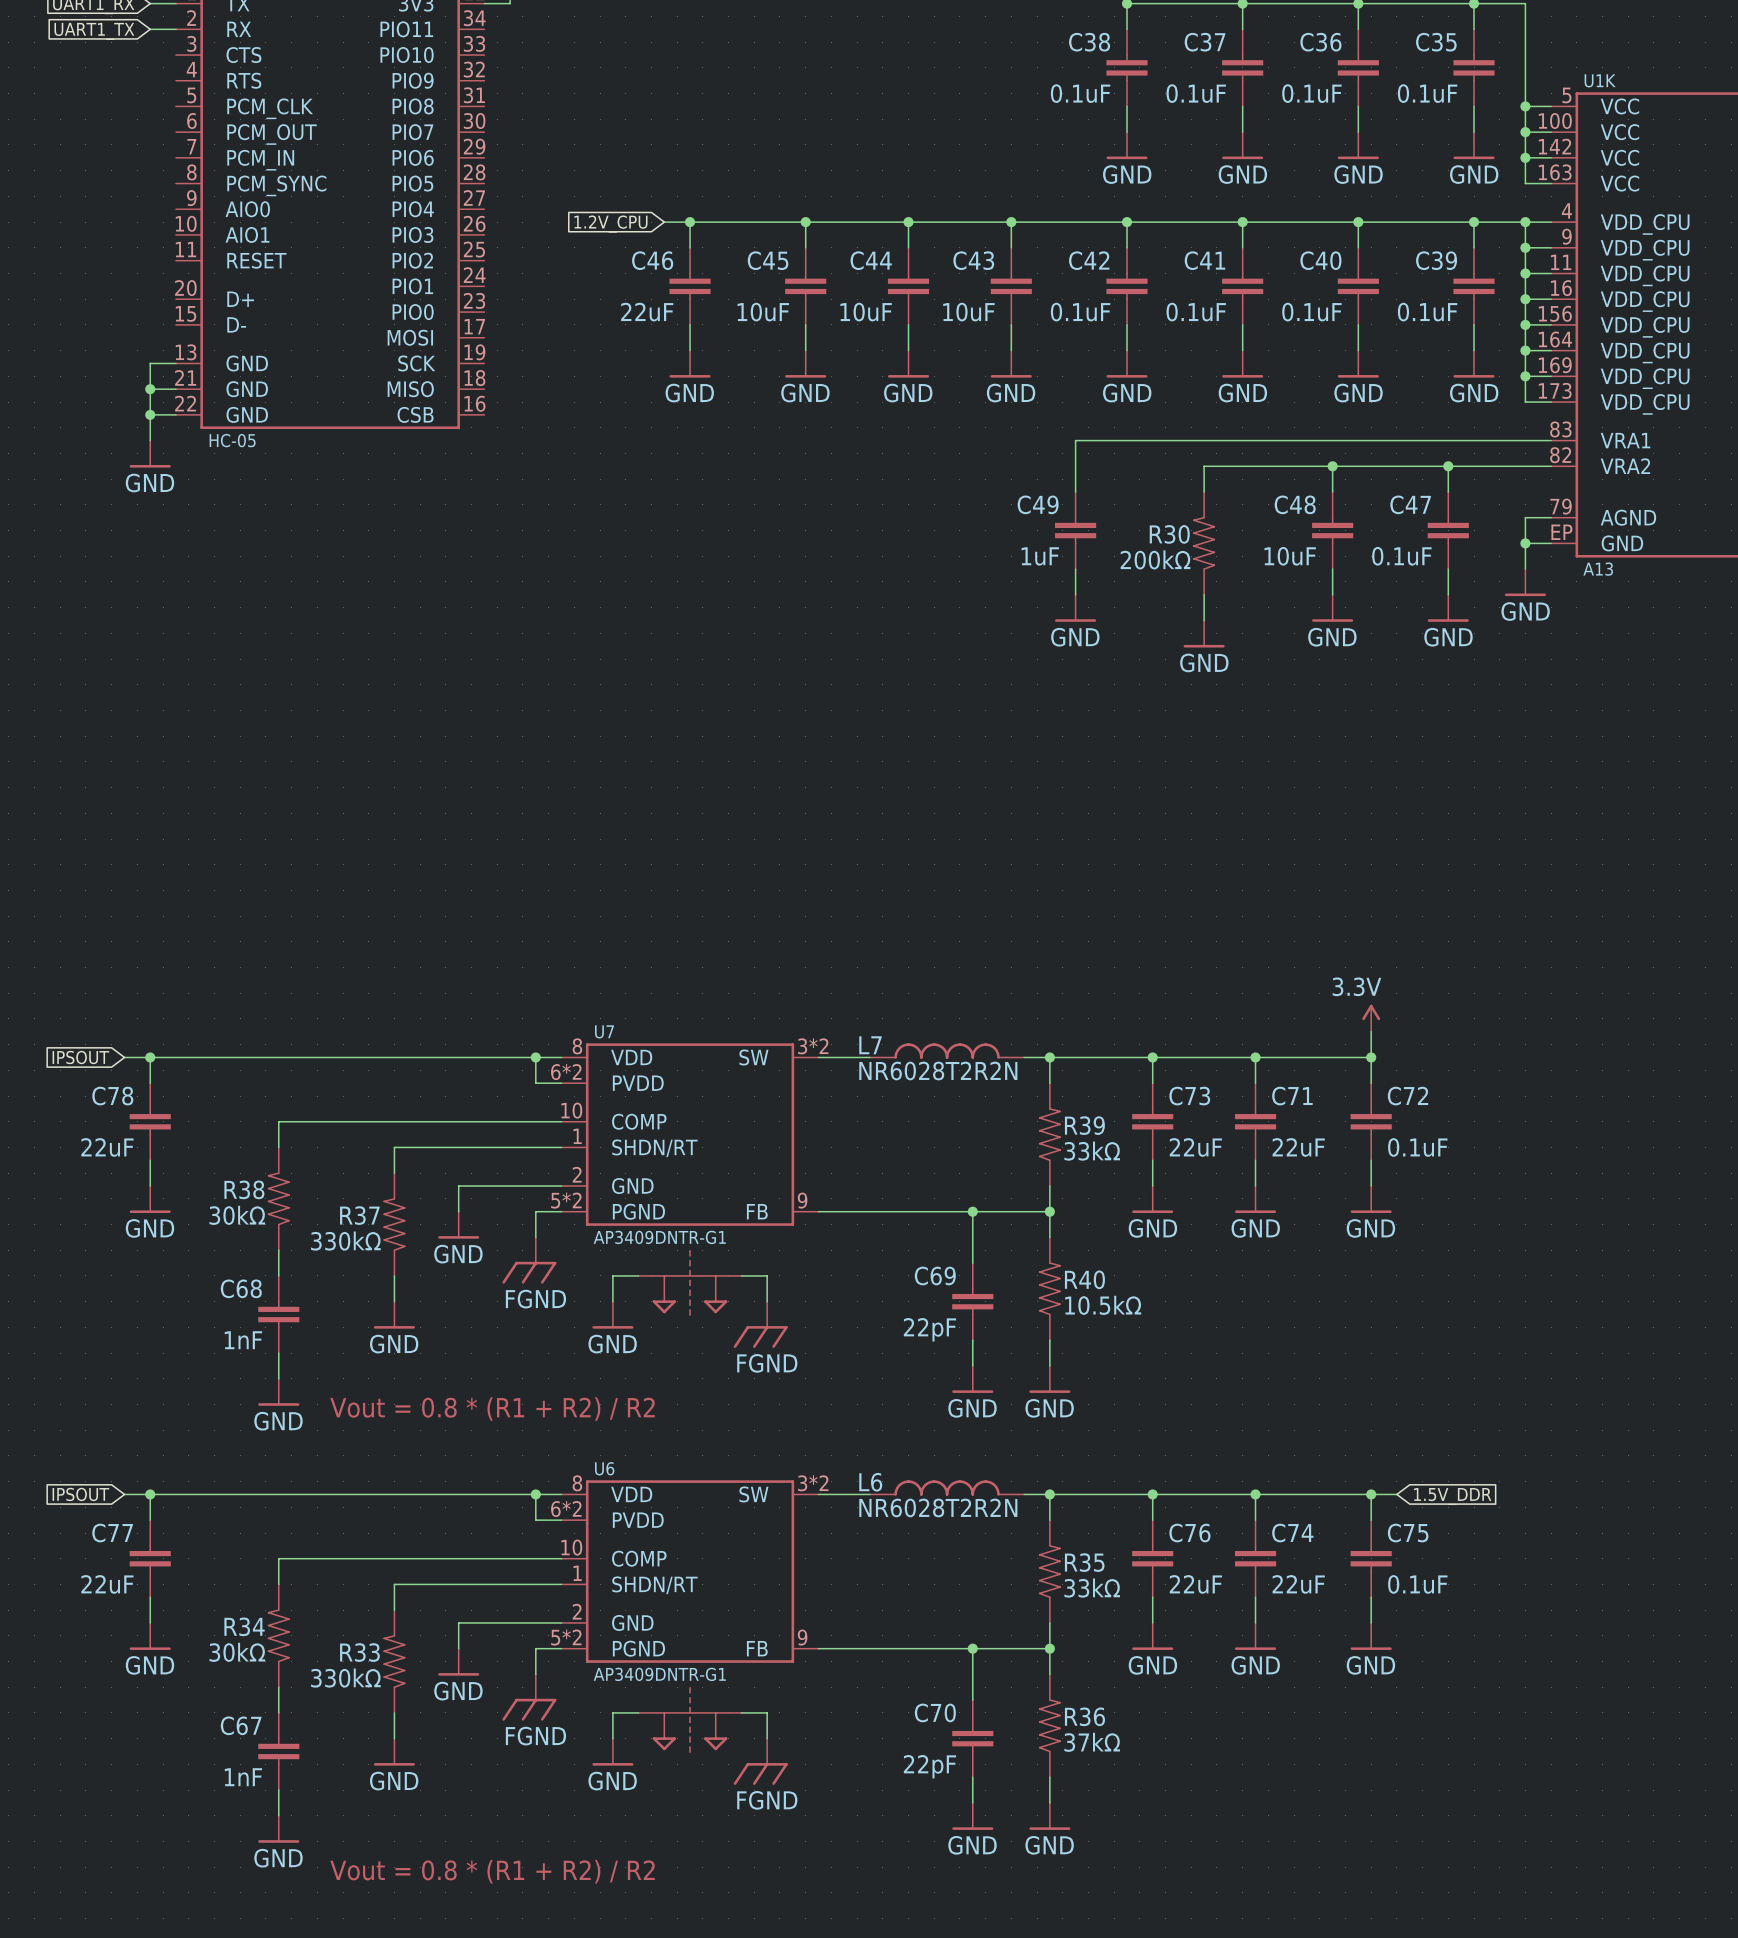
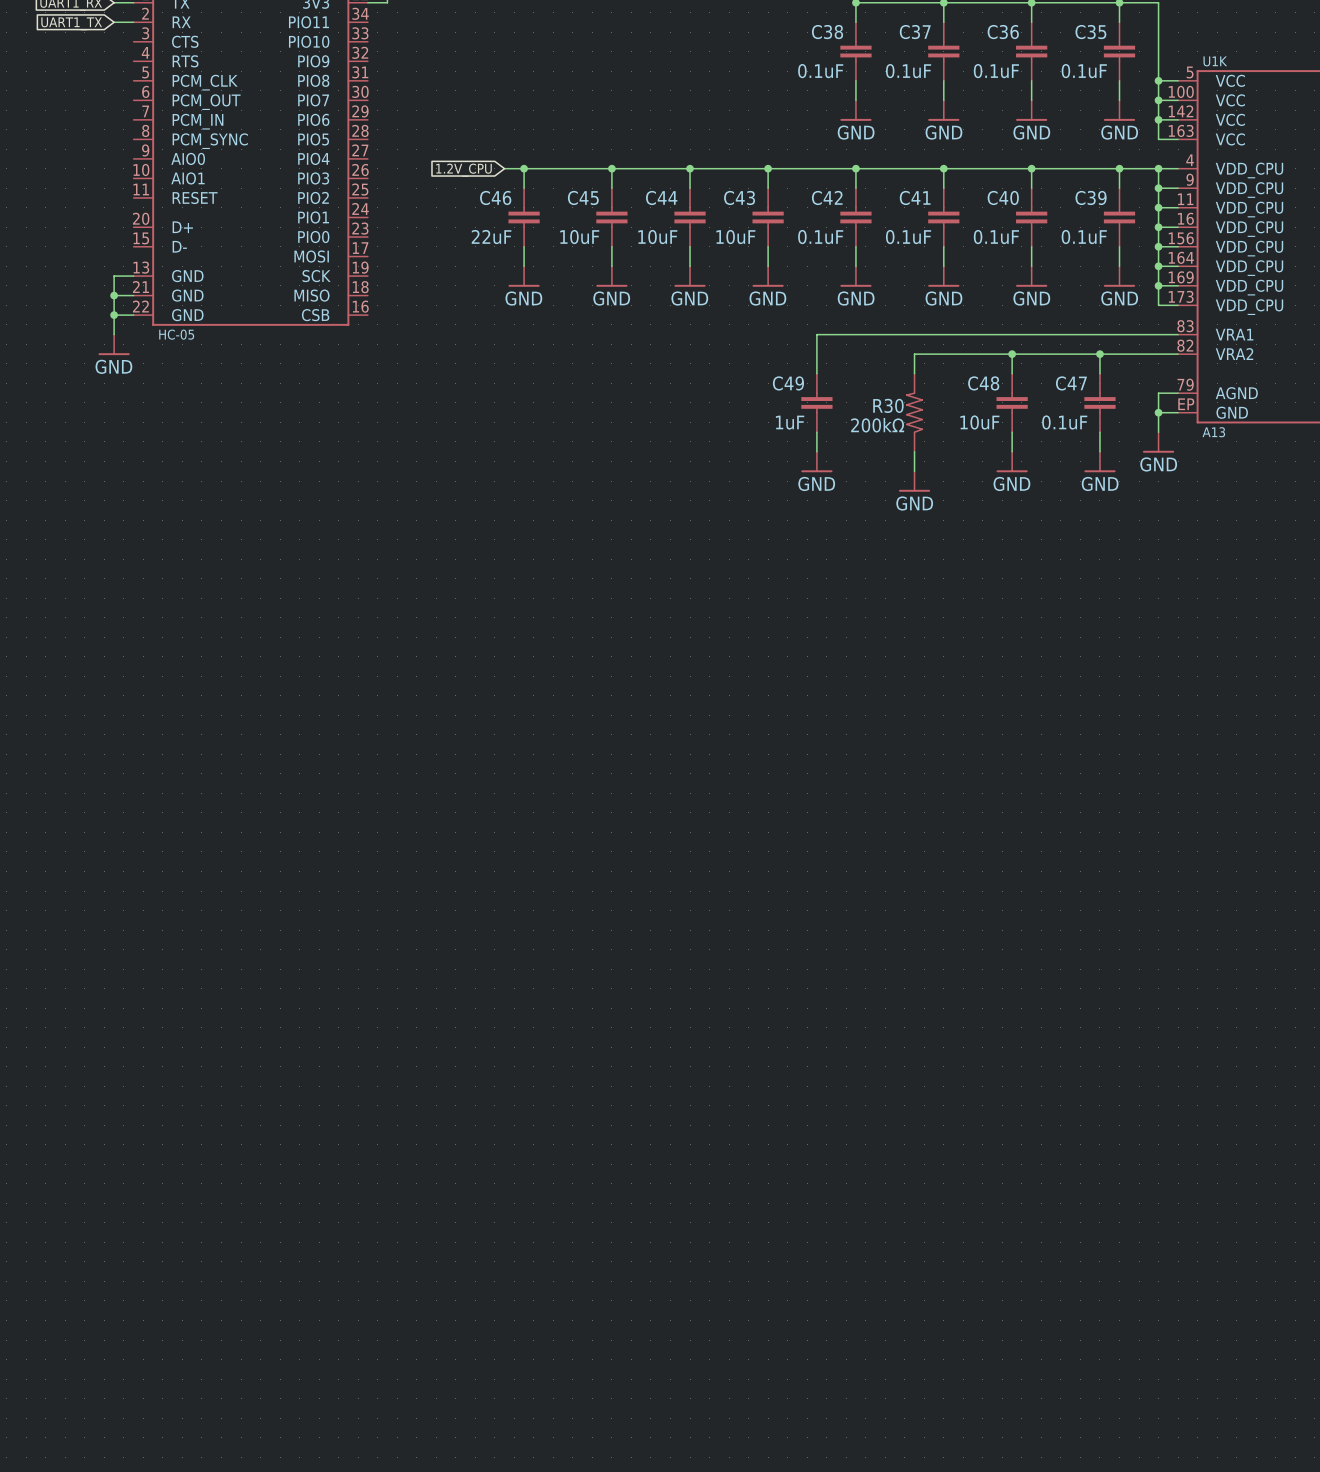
power symbol: 3.3V (1371, 1018) -> none
wire: (1371, 1031) (1371, 1083) -> none
L7: NR6028T2R2N (947, 1051) -> none
global label: IPSOUT (80, 1057) -> none
wire: (124, 1057) (561, 1057) -> none
wire: (150, 1057) (150, 1083) -> none
junction: (150, 1057) -> none
wire: (535, 1057) (535, 1083) (561, 1083) -> none
junction: (535, 1057) -> none
wire: (818, 1057) (869, 1057) -> none
wire: (1024, 1057) (1371, 1057) -> none
wire: (1049, 1057) (1049, 1083) -> none
junction: (1049, 1057) -> none
wire: (1152, 1057) (1152, 1083) -> none
junction: (1152, 1057) -> none
wire: (1255, 1057) (1255, 1083) -> none
junction: (1255, 1057) -> none
junction: (1371, 1057) -> none
C78: 22uF (150, 1121) -> none
wire: (561, 1121) (278, 1121) (278, 1147) -> none
C73: 22uF (1152, 1121) -> none
C71: 22uF (1255, 1121) -> none
C72: 0.1uF (1371, 1121) -> none
U7: AP3409DNTR-G1 (690, 1134) -> none
R39: 33kΩ (1049, 1134) -> none
wire: (561, 1147) (394, 1147) (394, 1173) -> none
wire: (150, 1160) (150, 1186) -> none
wire: (1152, 1160) (1152, 1186) -> none
wire: (1255, 1160) (1255, 1186) -> none
wire: (1371, 1160) (1371, 1186) -> none
wire: (561, 1186) (458, 1186) (458, 1211) -> none
wire: (1049, 1186) (1049, 1237) -> none
R38: 30kΩ (278, 1198) -> none
power symbol: GND (150, 1199) -> none
power symbol: GND (1152, 1199) -> none
power symbol: GND (1255, 1199) -> none
power symbol: GND (1371, 1199) -> none
wire: (561, 1211) (535, 1211) (535, 1237) -> none
wire: (818, 1211) (1049, 1211) -> none
wire: (972, 1211) (972, 1263) -> none
junction: (972, 1211) -> none
junction: (1049, 1211) -> none
R37: 330kΩ (394, 1224) -> none
power symbol: GND (458, 1225) -> none
wire: (278, 1250) (278, 1275) -> none
power symbol: FGND (529, 1260) -> none
wire: (394, 1275) (394, 1301) -> none
wire: (638, 1275) (612, 1275) (612, 1301) -> none
wire: (741, 1275) (767, 1275) (767, 1301) -> none
part: (690, 1283) -> none
R40: 10.5kΩ (1049, 1288) -> none
C69: 22pF (972, 1301) -> none
C68: 1nF (278, 1314) -> none
power symbol: GND (394, 1315) -> none
power symbol: GND (612, 1315) -> none
power symbol: FGND (760, 1324) -> none
wire: (972, 1340) (972, 1365) -> none
wire: (1049, 1340) (1049, 1365) -> none
wire: (278, 1353) (278, 1378) -> none
power symbol: GND (972, 1379) -> none
power symbol: GND (1049, 1379) -> none
power symbol: GND (278, 1392) -> none
text: Vout = 0.8 * (R1 + R2) / R2 (492, 1409) -> none
L6: NR6028T2R2N (947, 1488) -> none
global label: IPSOUT (80, 1494) -> none
wire: (124, 1494) (561, 1494) -> none
wire: (150, 1494) (150, 1520) -> none
junction: (150, 1494) -> none
wire: (535, 1494) (535, 1520) (561, 1520) -> none
junction: (535, 1494) -> none
wire: (818, 1494) (869, 1494) -> none
wire: (1024, 1494) (1396, 1494) -> none
wire: (1049, 1494) (1049, 1520) -> none
junction: (1049, 1494) -> none
wire: (1152, 1494) (1152, 1520) -> none
junction: (1152, 1494) -> none
wire: (1255, 1494) (1255, 1520) -> none
junction: (1255, 1494) -> none
wire: (1371, 1494) (1371, 1520) -> none
junction: (1371, 1494) -> none
global label: 1.5V_DDR (1452, 1496) -> none
C77: 22uF (150, 1558) -> none
wire: (561, 1558) (278, 1558) (278, 1584) -> none
C76: 22uF (1152, 1558) -> none
C74: 22uF (1255, 1558) -> none
C75: 0.1uF (1371, 1558) -> none
U6: AP3409DNTR-G1 (690, 1571) -> none
R35: 33kΩ (1049, 1571) -> none
wire: (561, 1584) (394, 1584) (394, 1610) -> none
wire: (150, 1597) (150, 1622) -> none
wire: (1152, 1597) (1152, 1622) -> none
wire: (1255, 1597) (1255, 1622) -> none
wire: (1371, 1597) (1371, 1622) -> none
wire: (561, 1622) (458, 1622) (458, 1648) -> none
wire: (1049, 1622) (1049, 1674) -> none
R34: 30kΩ (278, 1635) -> none
power symbol: GND (150, 1636) -> none
power symbol: GND (1152, 1636) -> none
power symbol: GND (1255, 1636) -> none
power symbol: GND (1371, 1636) -> none
wire: (561, 1648) (535, 1648) (535, 1674) -> none
wire: (818, 1648) (1049, 1648) -> none
wire: (972, 1648) (972, 1700) -> none
junction: (972, 1648) -> none
junction: (1049, 1648) -> none
R33: 330kΩ (394, 1661) -> none
power symbol: GND (458, 1662) -> none
wire: (278, 1687) (278, 1712) -> none
power symbol: FGND (529, 1697) -> none
wire: (394, 1712) (394, 1738) -> none
wire: (638, 1712) (612, 1712) (612, 1738) -> none
wire: (741, 1712) (767, 1712) (767, 1738) -> none
part: (690, 1720) -> none
R36: 37kΩ (1049, 1725) -> none
C70: 22pF (972, 1738) -> none
C67: 1nF (278, 1751) -> none
power symbol: GND (394, 1752) -> none
power symbol: GND (612, 1752) -> none
power symbol: FGND (760, 1761) -> none
wire: (972, 1777) (972, 1802) -> none
wire: (1049, 1777) (1049, 1802) -> none
wire: (278, 1790) (278, 1815) -> none
power symbol: GND (972, 1816) -> none
power symbol: GND (1049, 1816) -> none
power symbol: GND (278, 1829) -> none
text: Vout = 0.8 * (R1 + R2) / R2 (492, 1871) -> none

